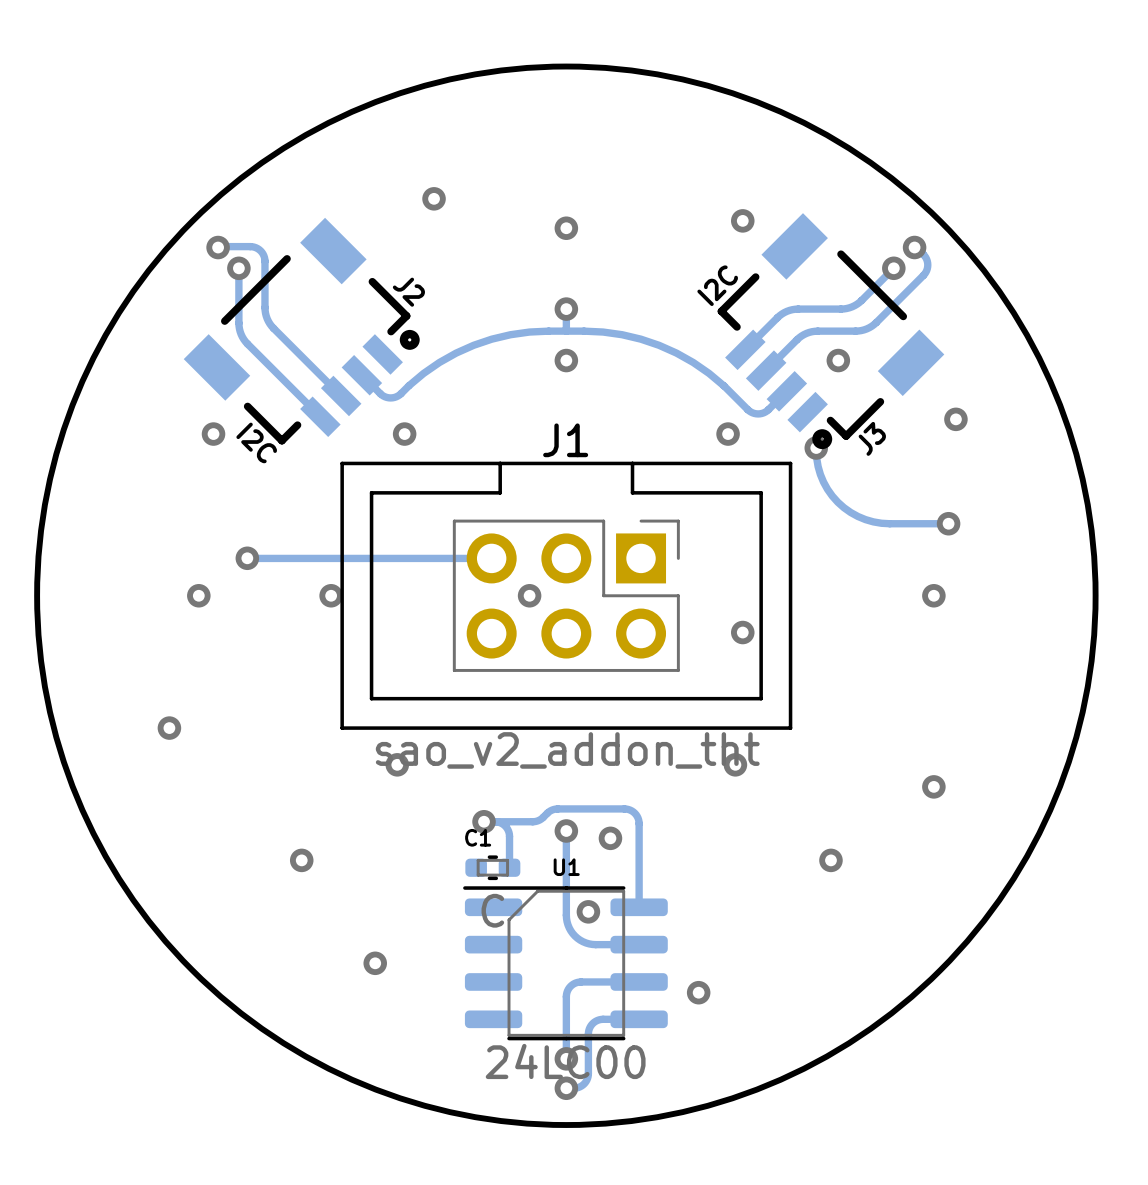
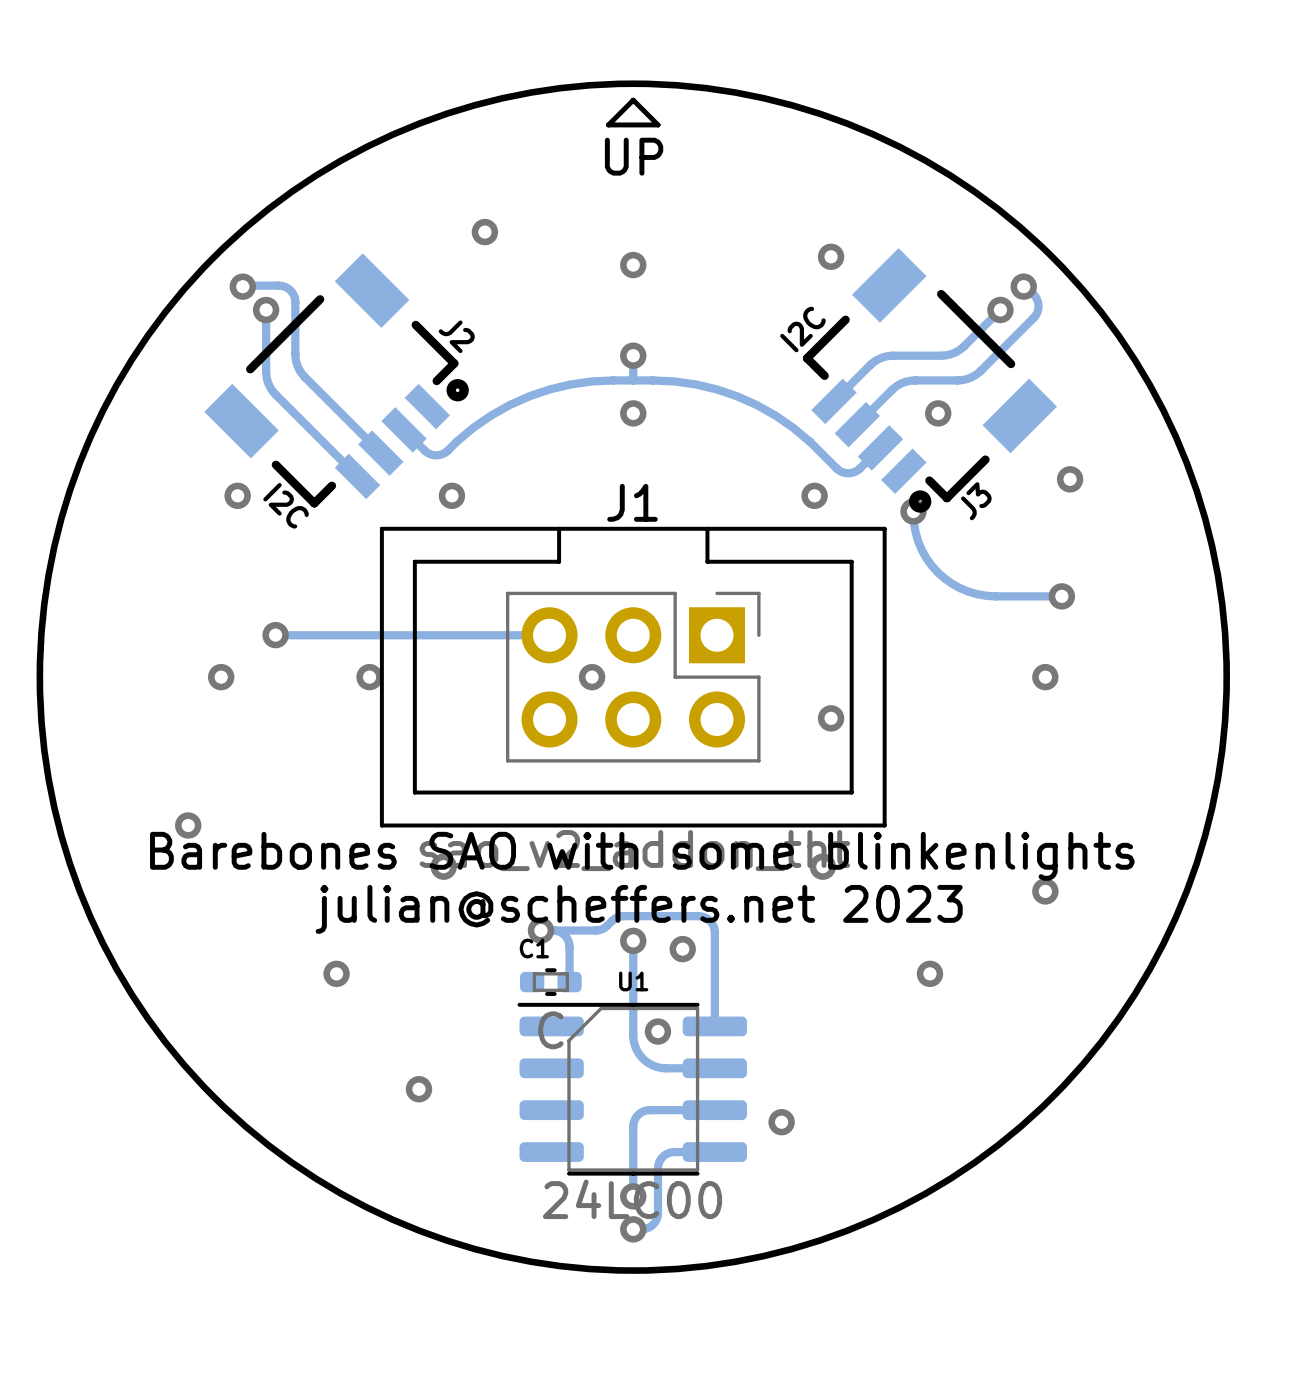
line: none -> (633, 100) (658, 124) (608, 124) (633, 100)
text: none -> UP (634, 156)
text: none -> Barebones SAO with some blinkenlights (642, 856)
text: none -> julian@scheffers.net 2023 (639, 909)

